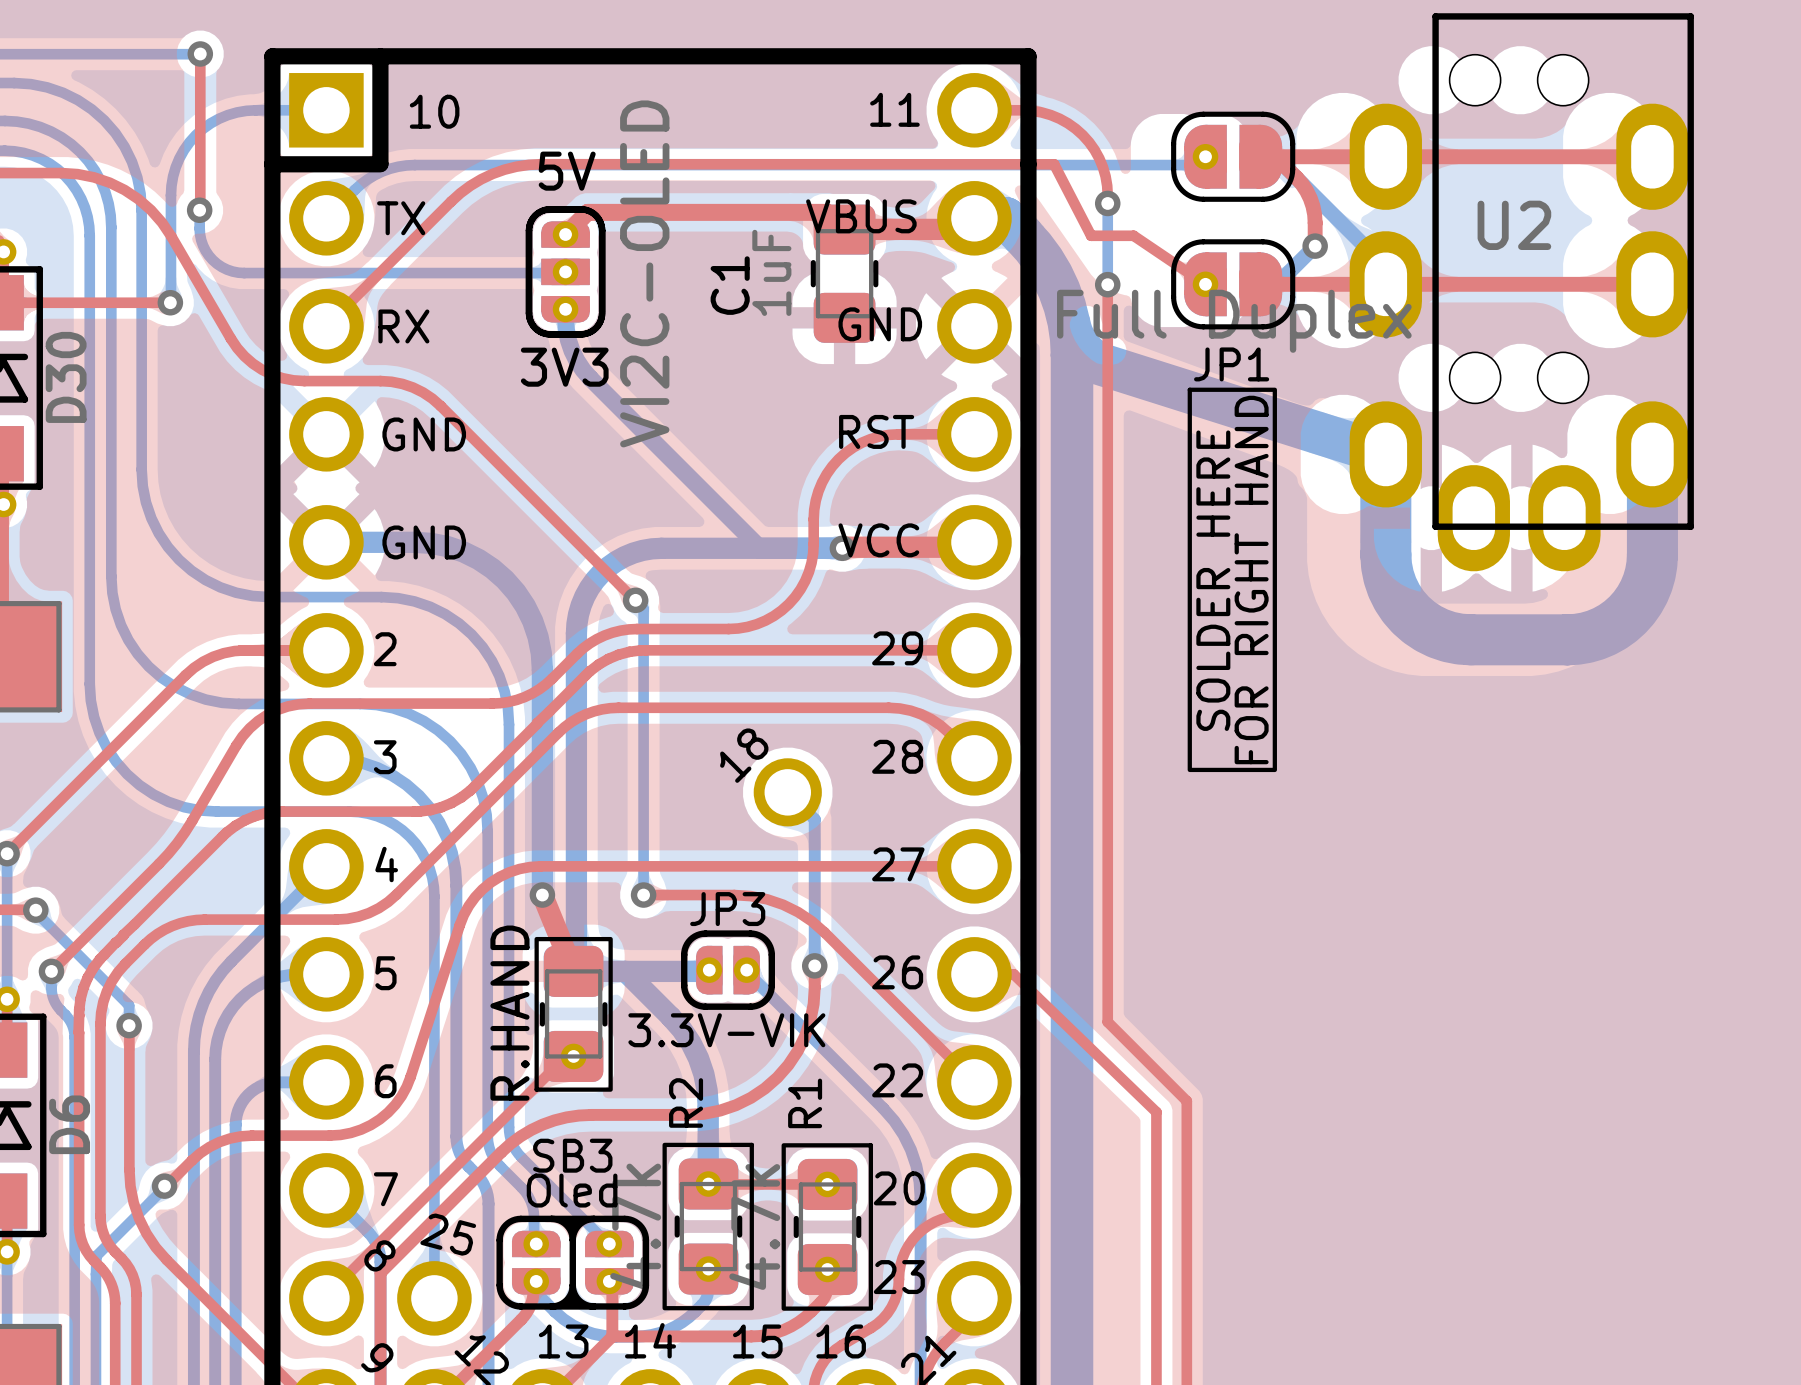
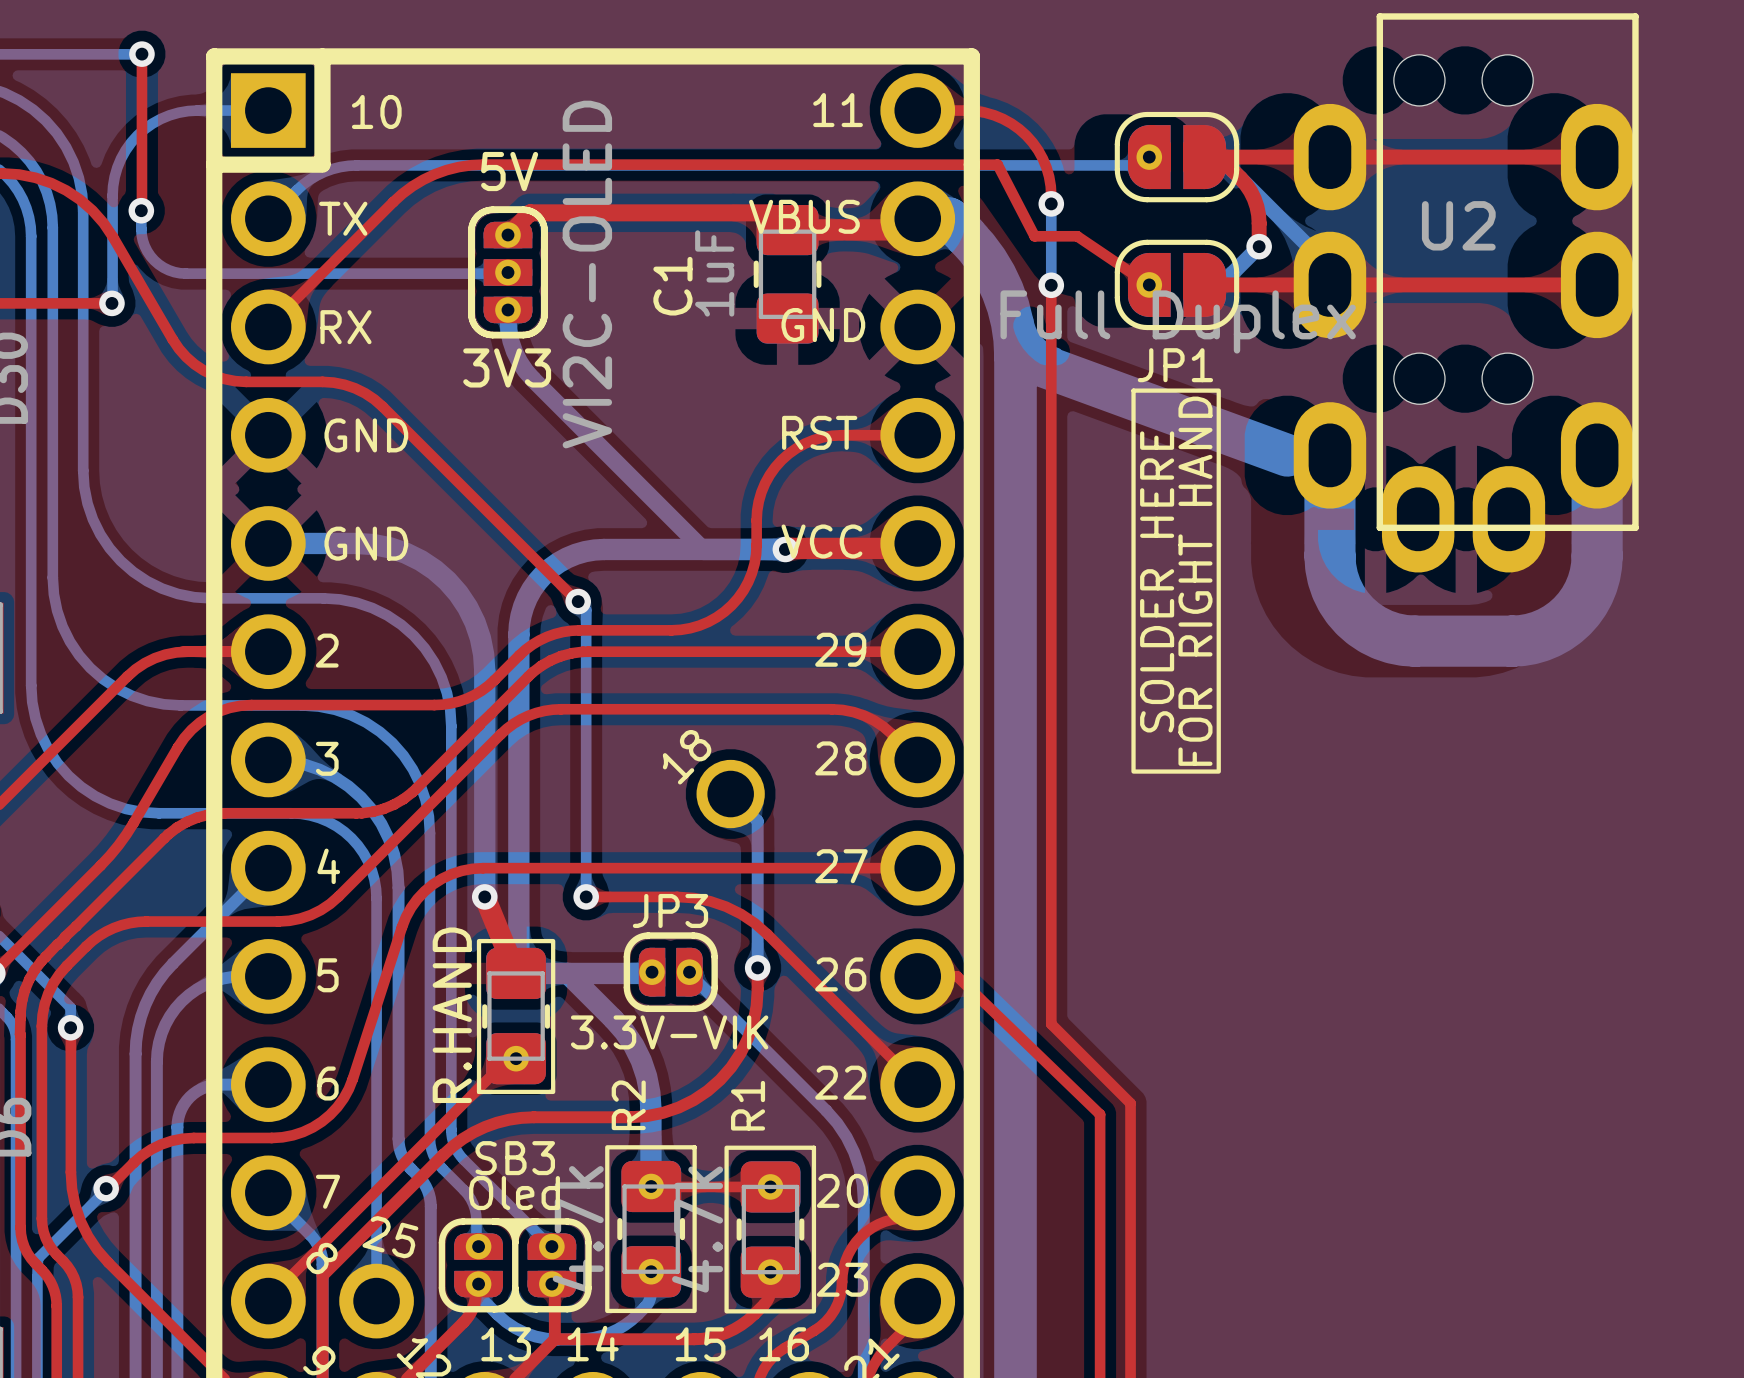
bottom track: (1072, 355) (1385, 454) -> (1015, 355) (1287, 455)

